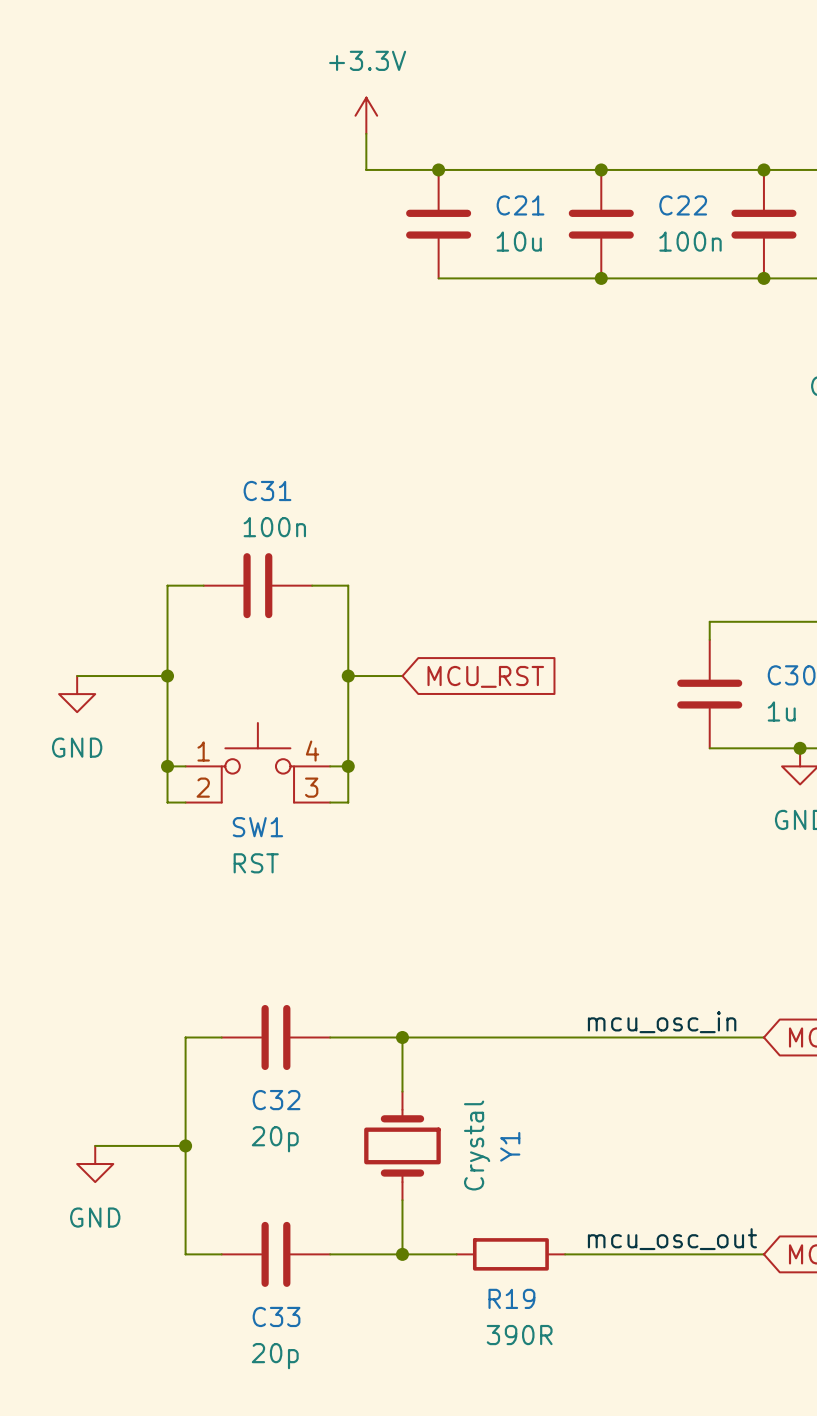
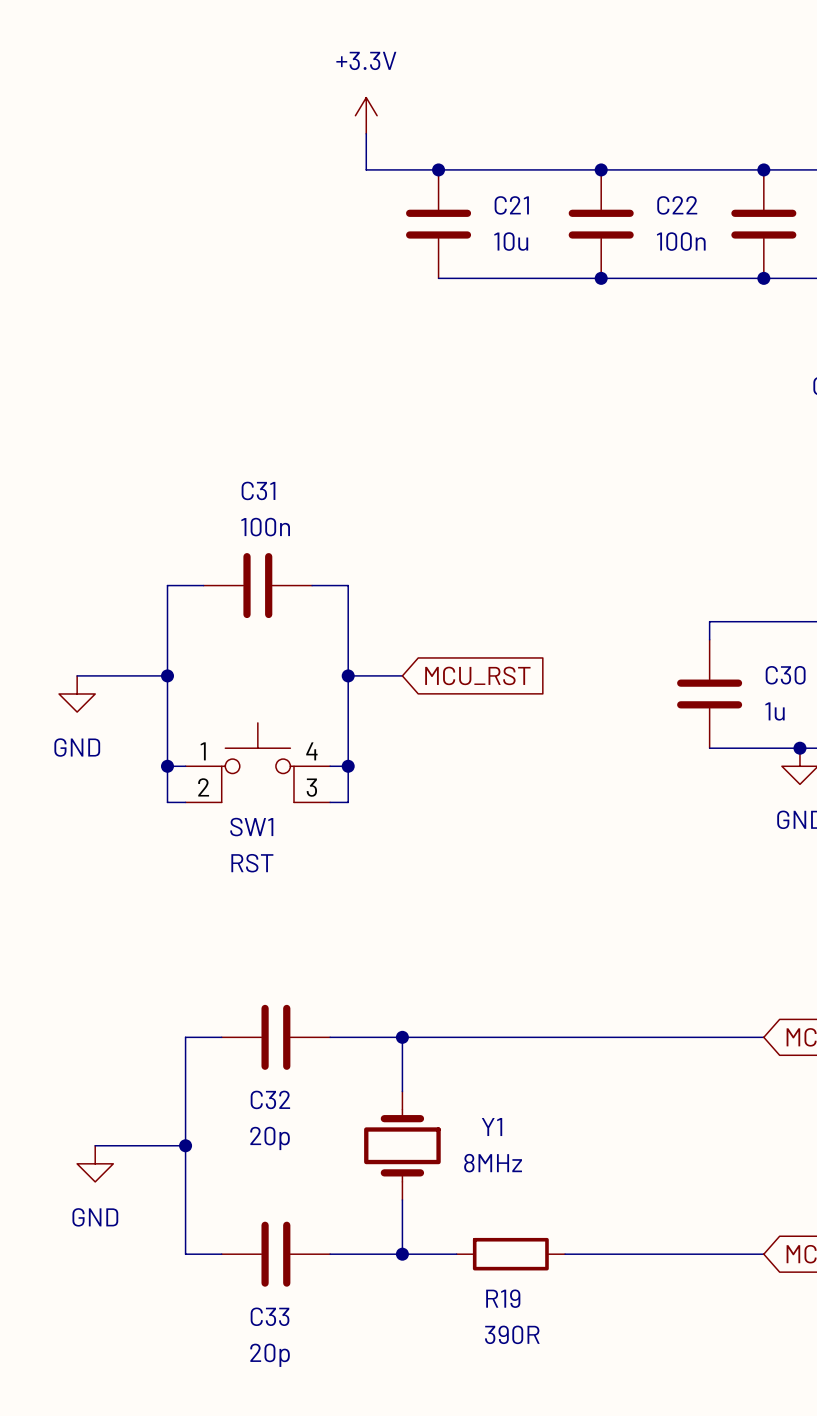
label: mcu_osc_in (662, 1022) -> none
Y1 value: Crystal (477, 1145) -> 8MHz (493, 1163)
Y1 name rotation: 0° (510, 1146) -> 90° clockwise (492, 1127)
label: mcu_osc_out (672, 1239) -> none

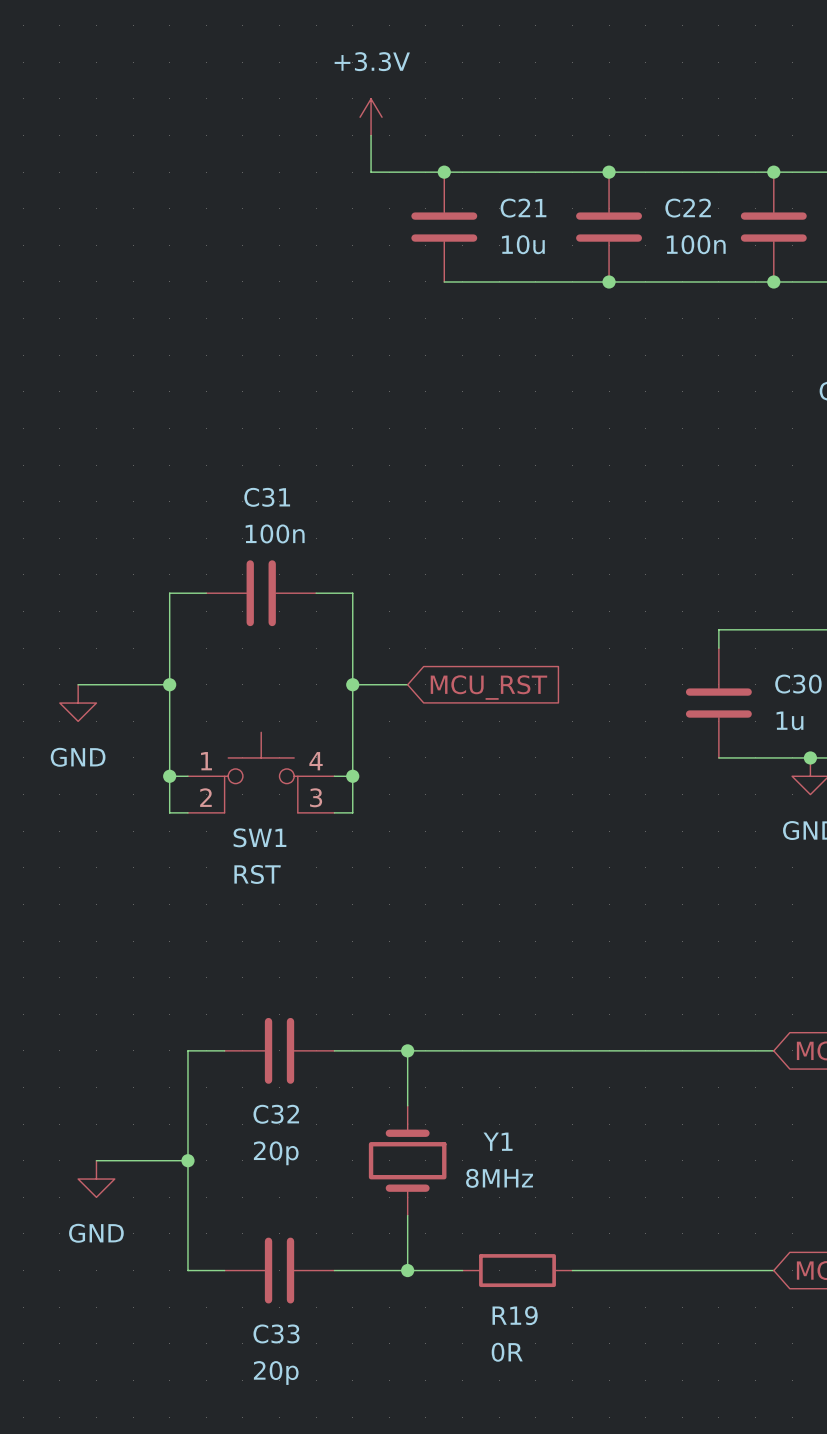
R19 value: 390R (512, 1334) -> 0R (507, 1352)

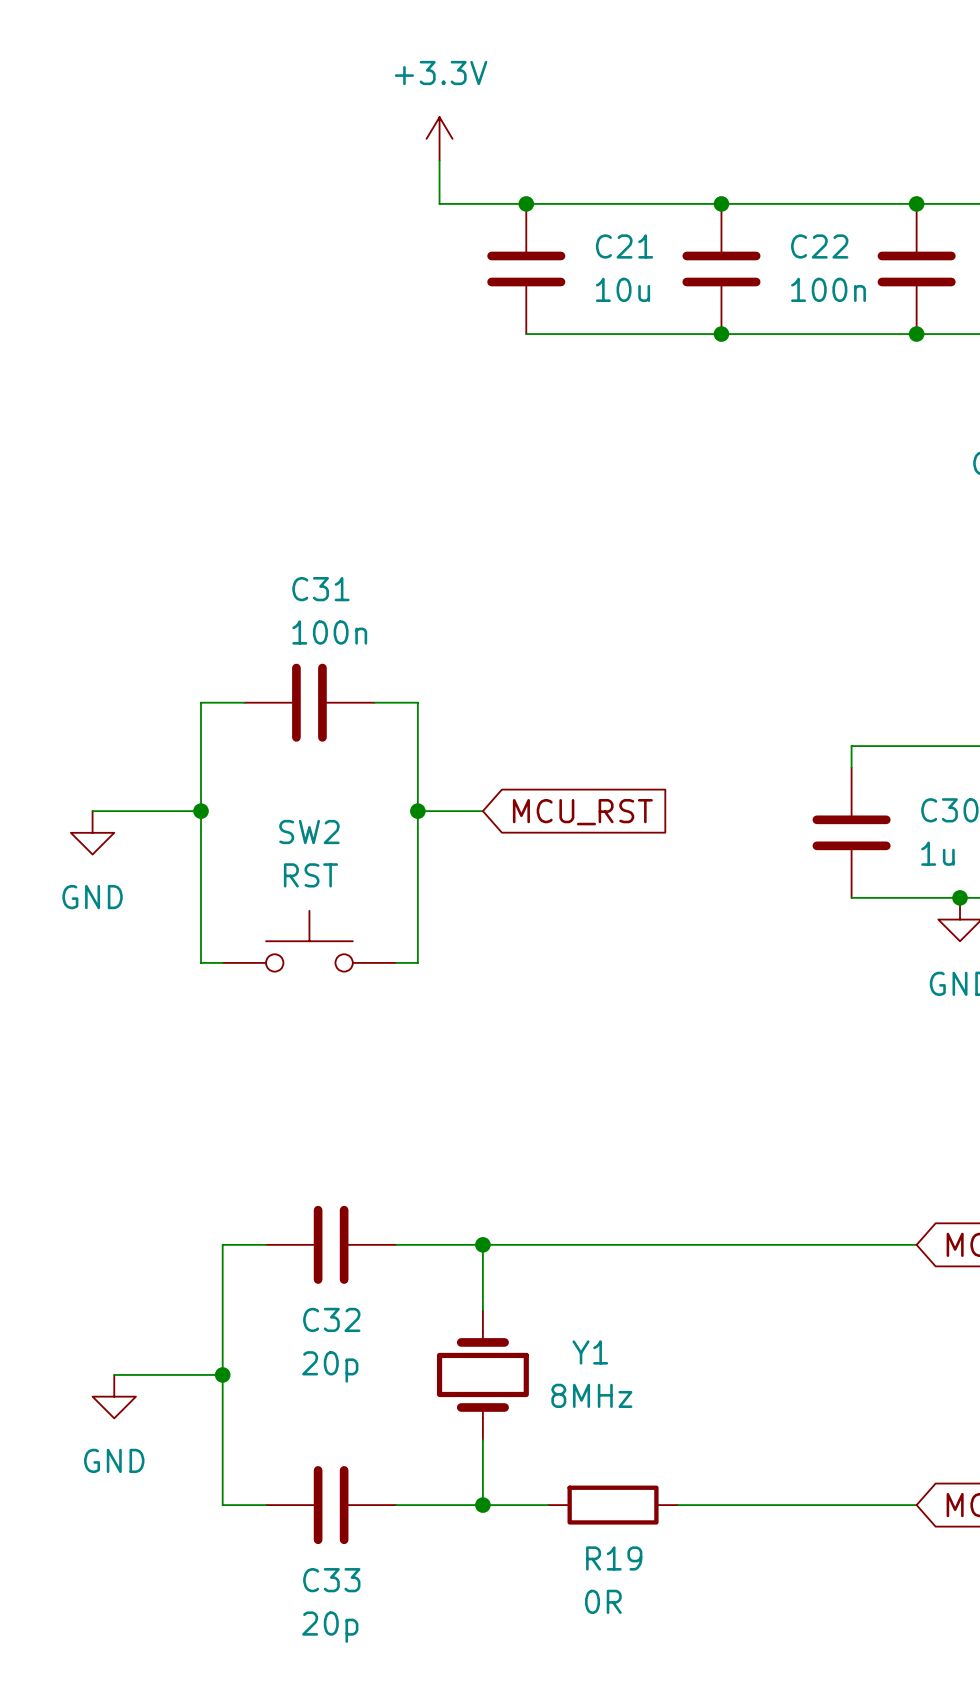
SW1: RST (261, 772) -> none
wire: (169, 776) (187, 776) -> none
junction: (169, 776) -> none
wire: (334, 776) (352, 776) -> none
junction: (352, 776) -> none
SW2: none -> RST (309, 941)

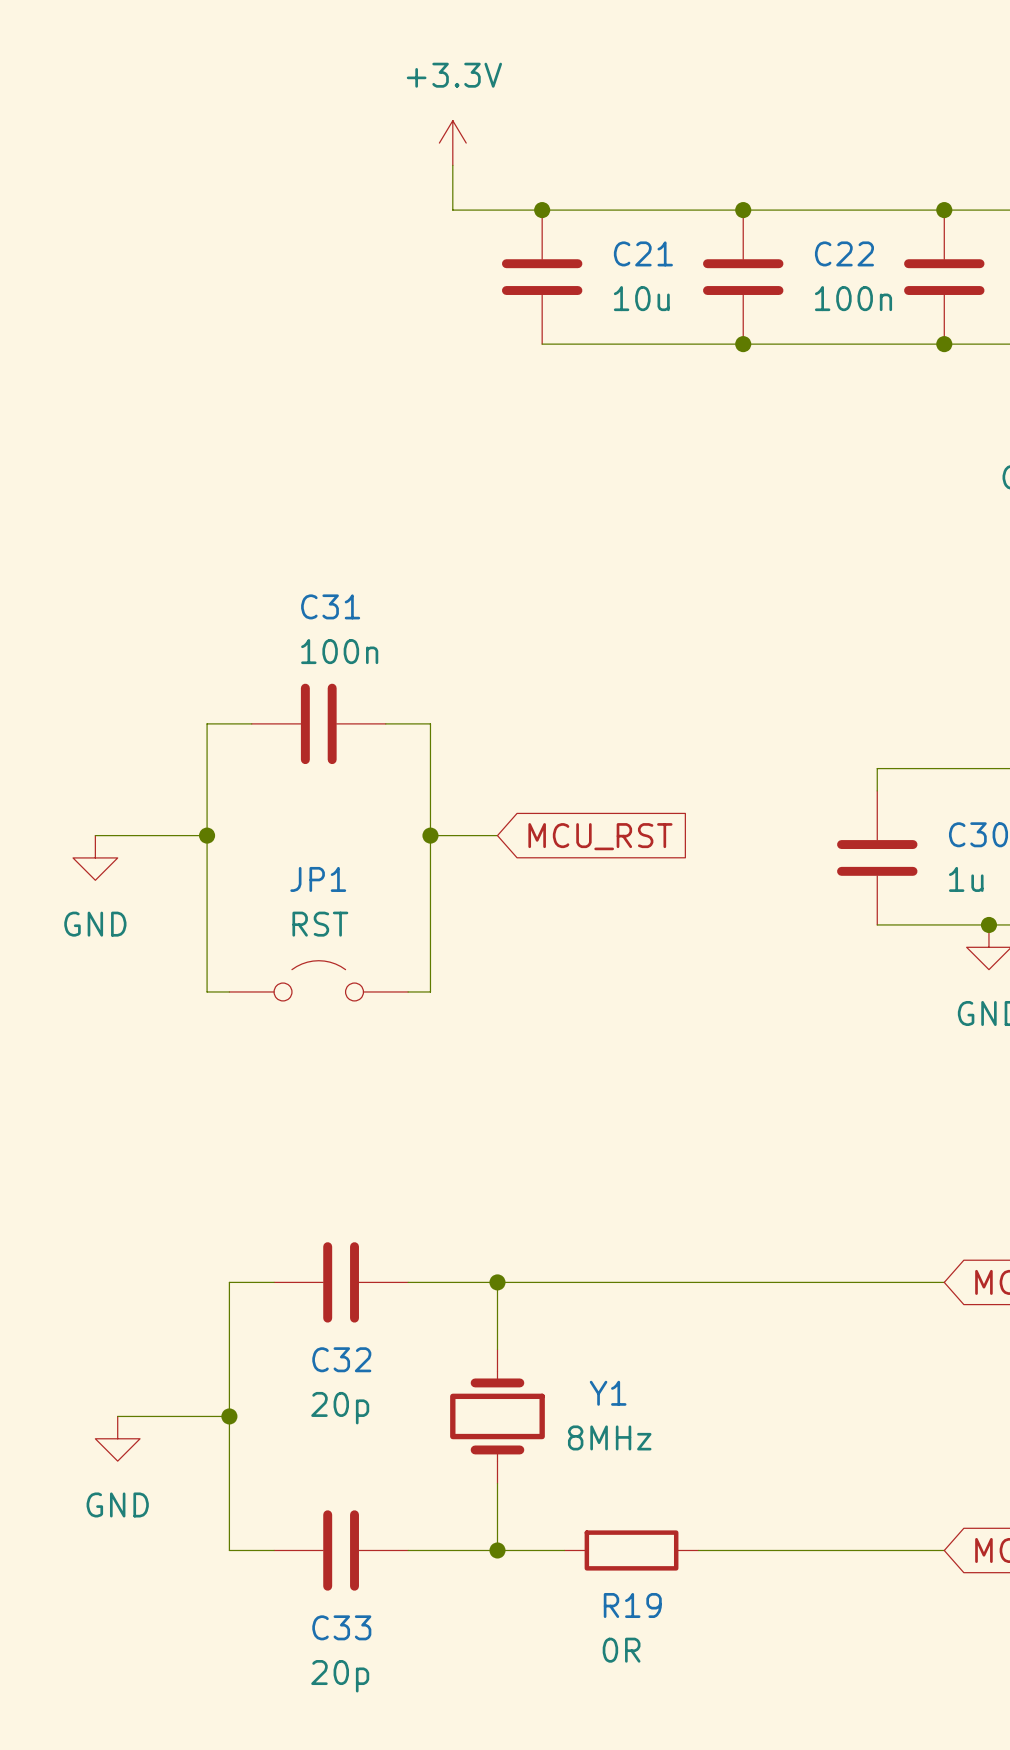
SW2: RST (309, 941) -> none
JP1: none -> RST (318, 980)

